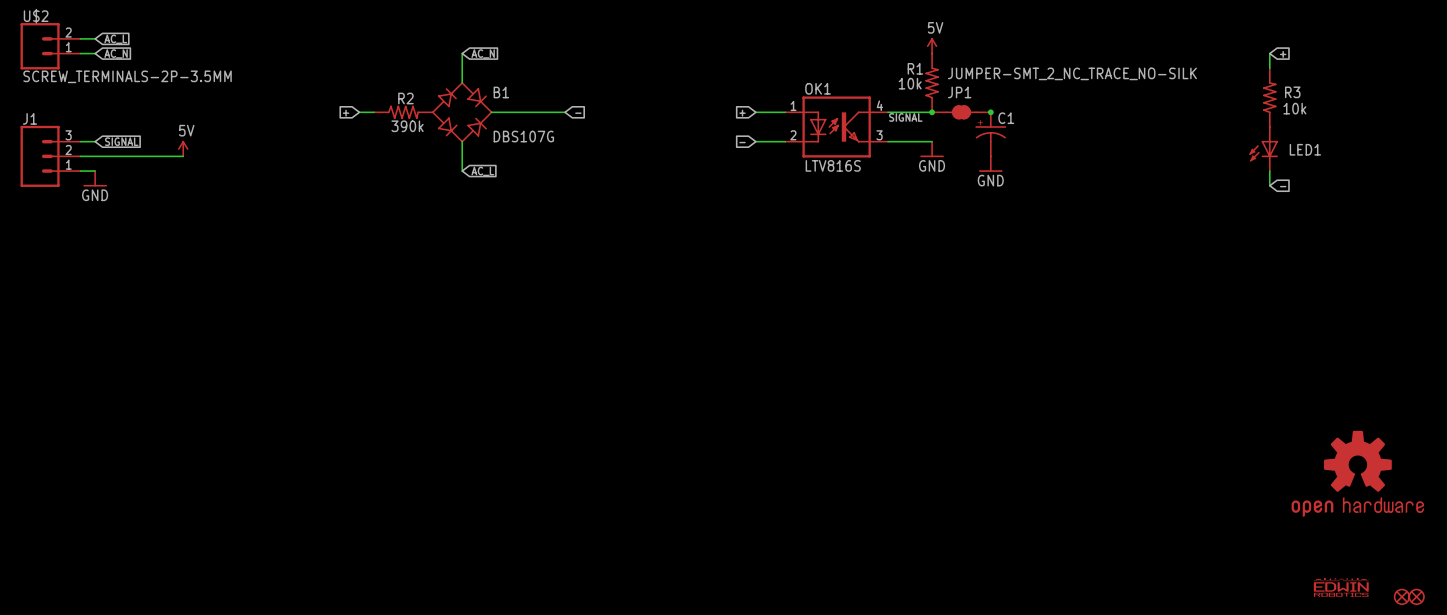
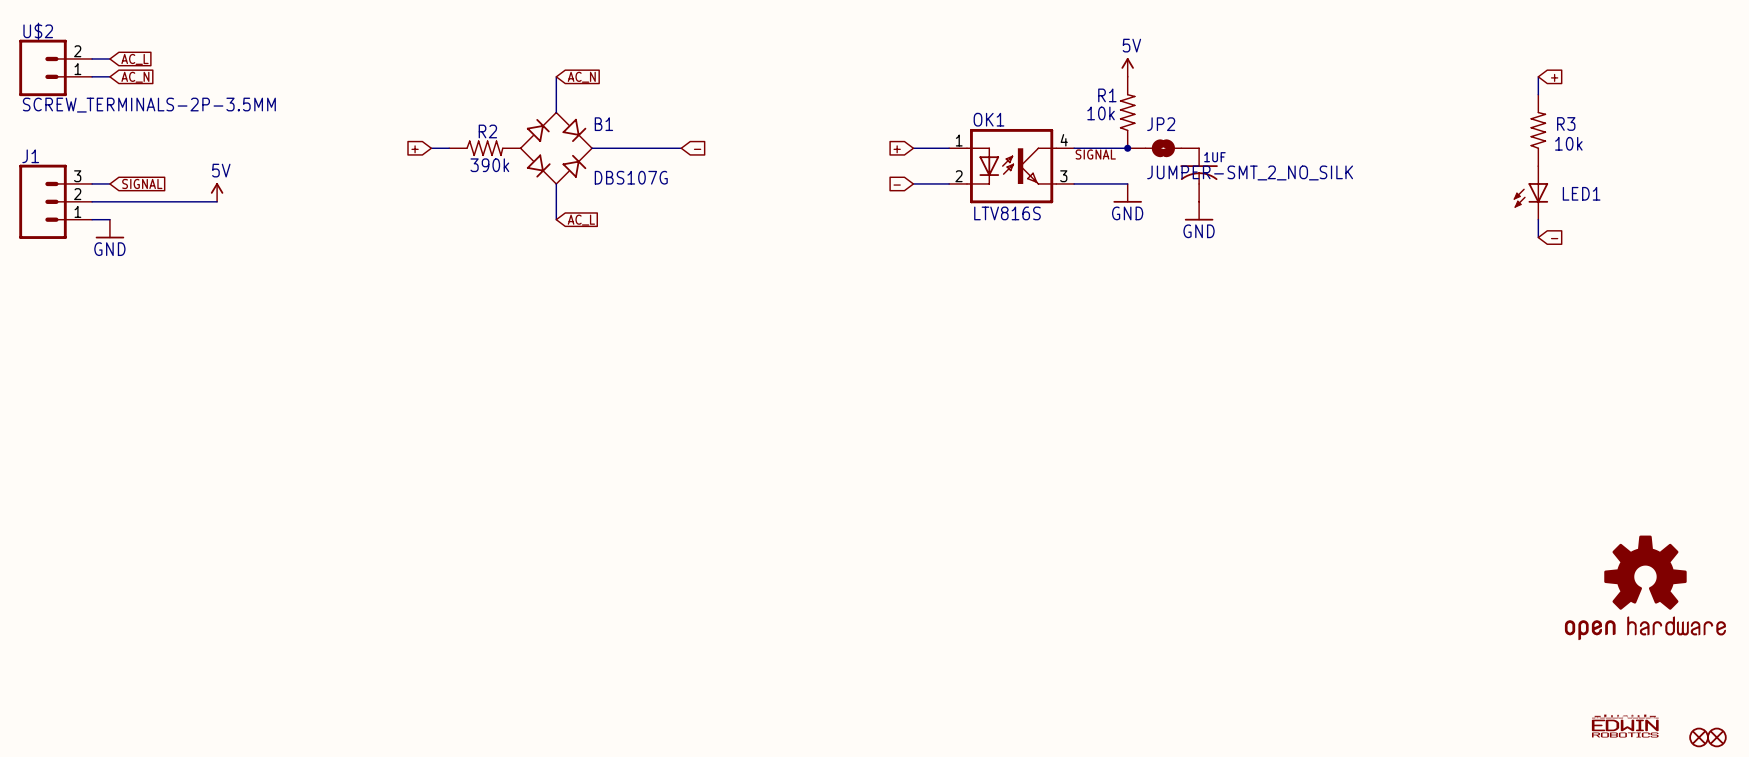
JP1: JUMPER-SMT_2_NC_TRACE_NO-SILK (961, 112) -> none
JP2: none -> JUMPER-SMT_2_NO_SILK (1163, 148)
junction: (990, 112) -> none
C1: (990, 134) -> none
1UF: none -> (1199, 175)

